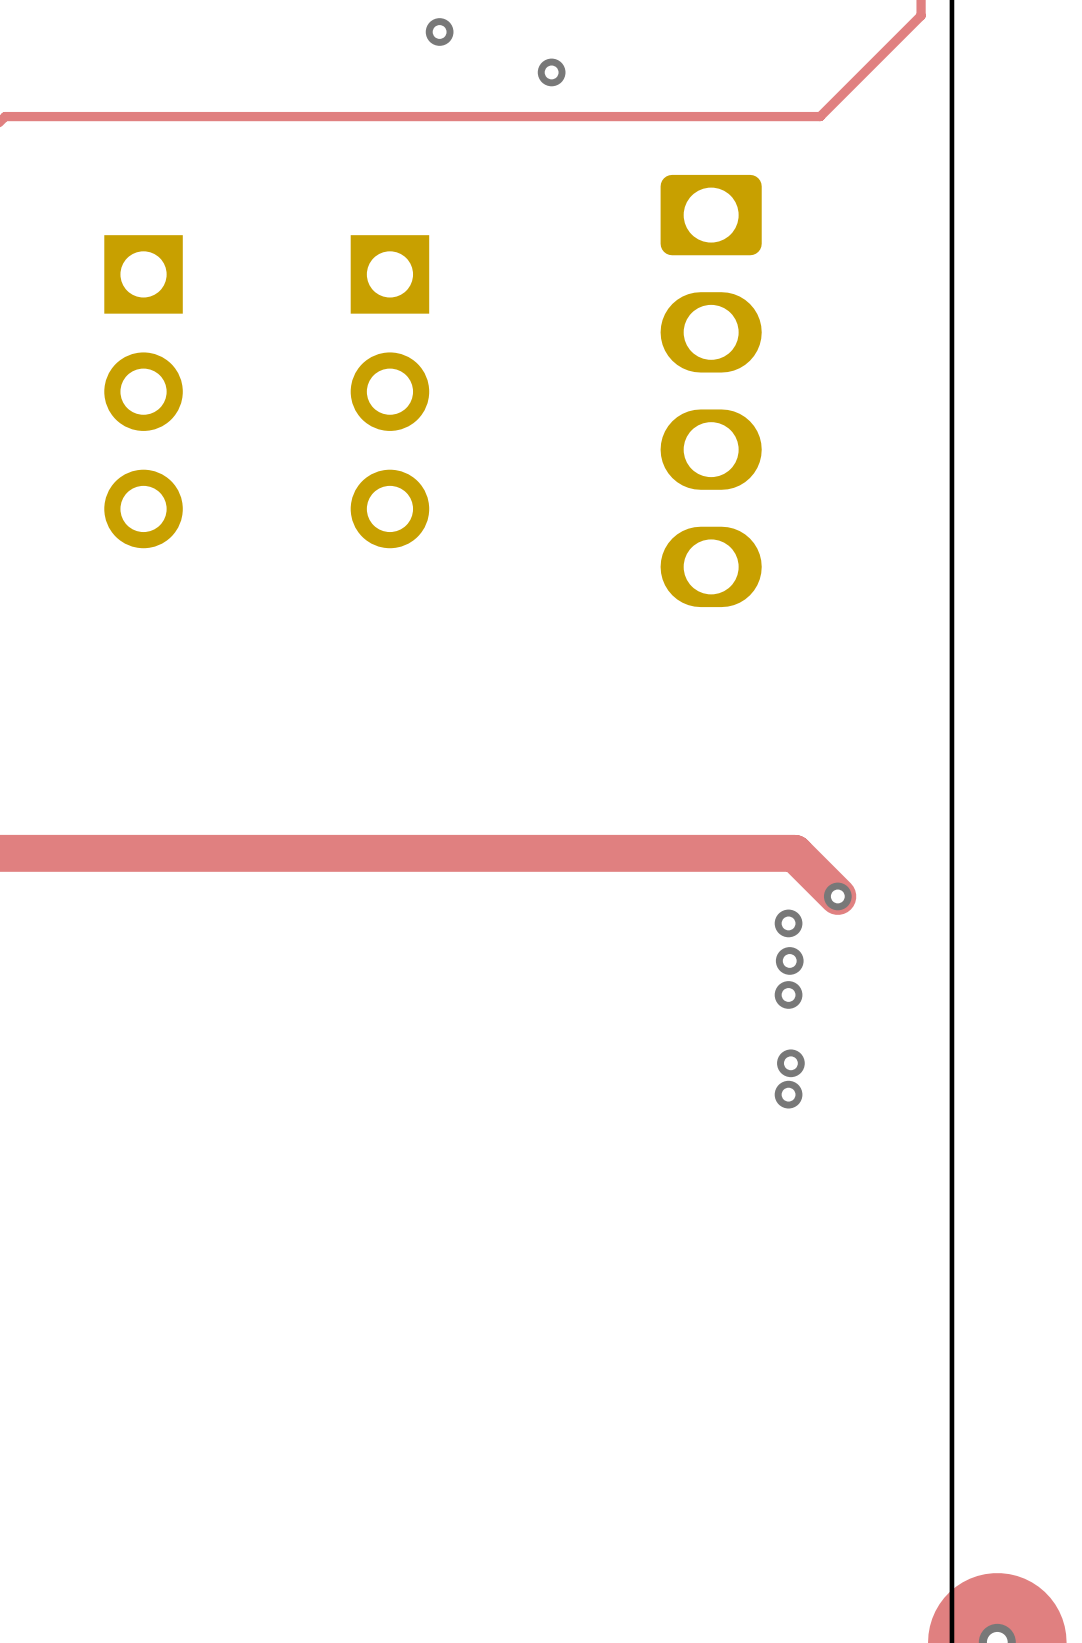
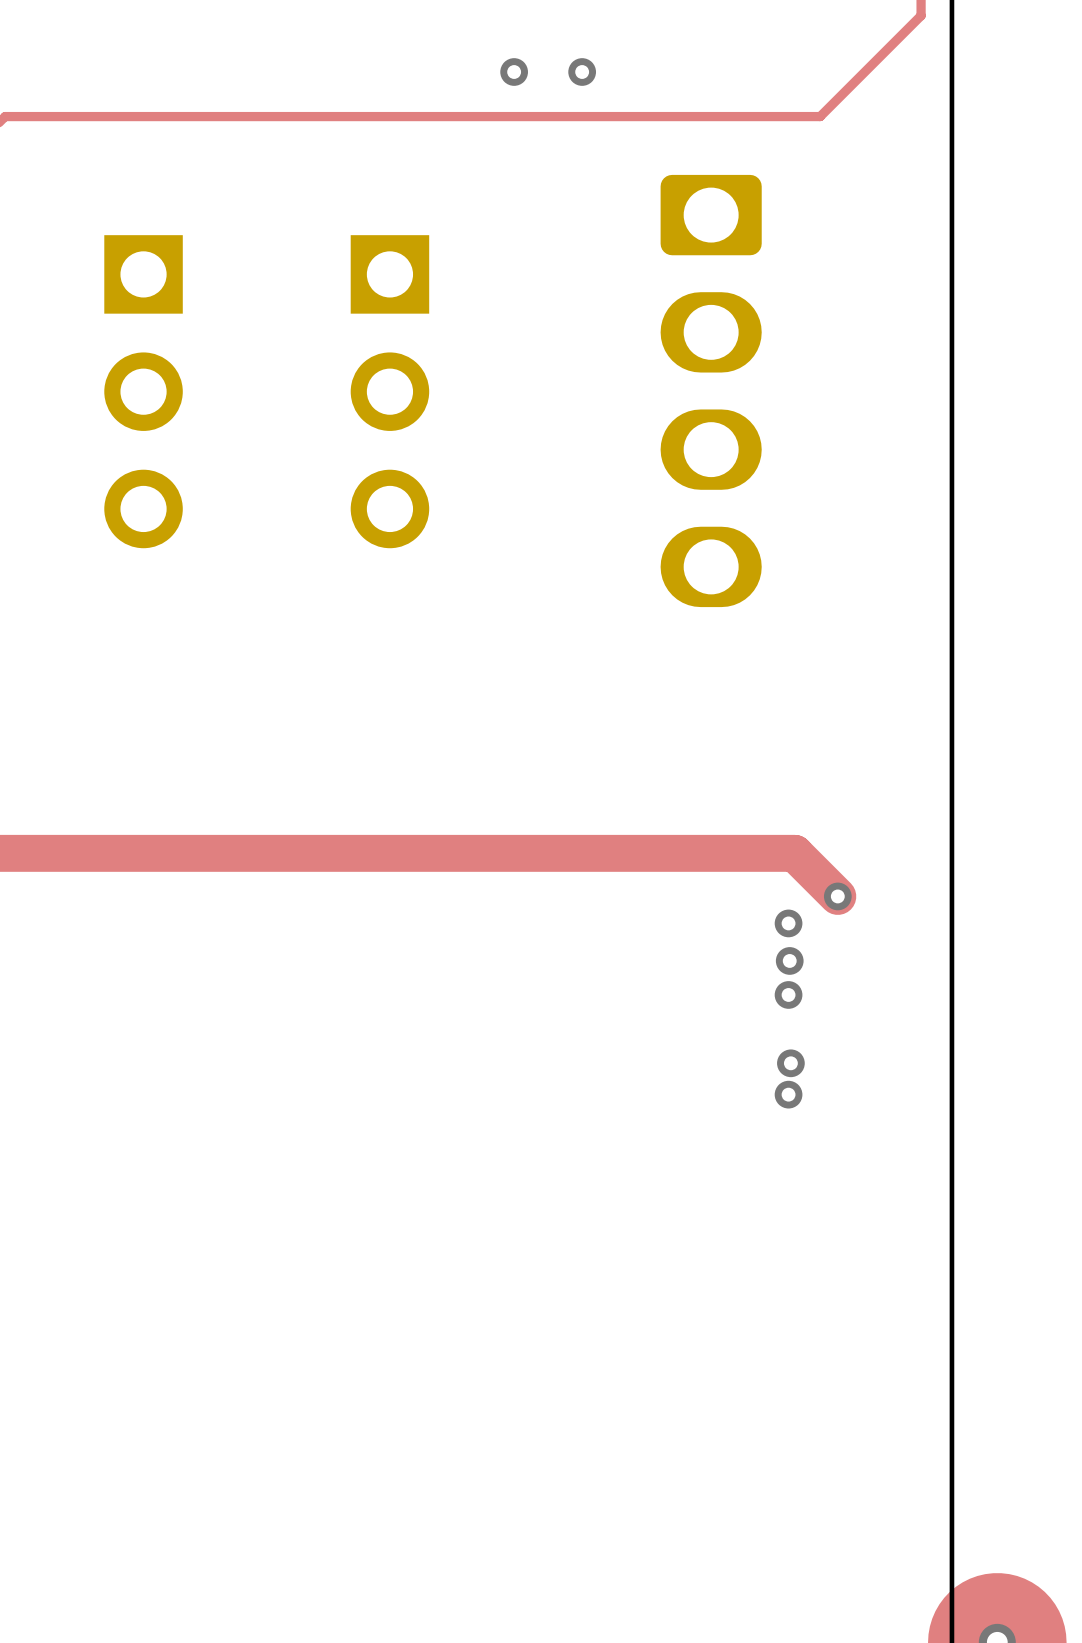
via: (439, 31) -> none
via: none -> (514, 72)
via: (551, 72) -> none
via: none -> (582, 72)

